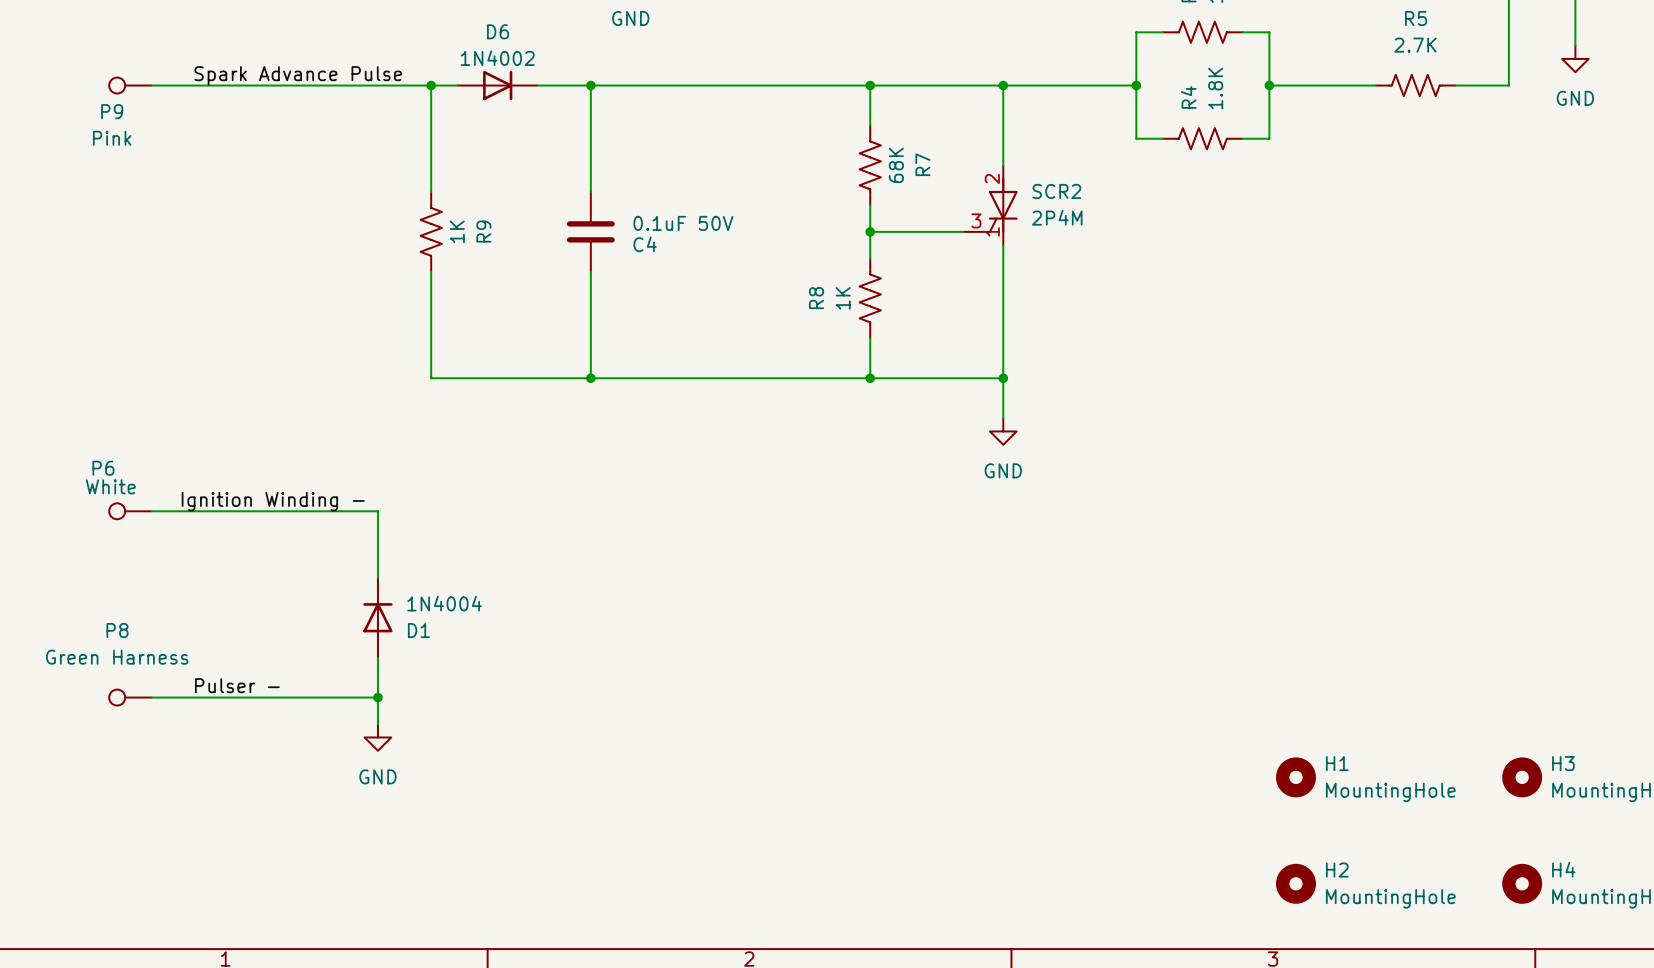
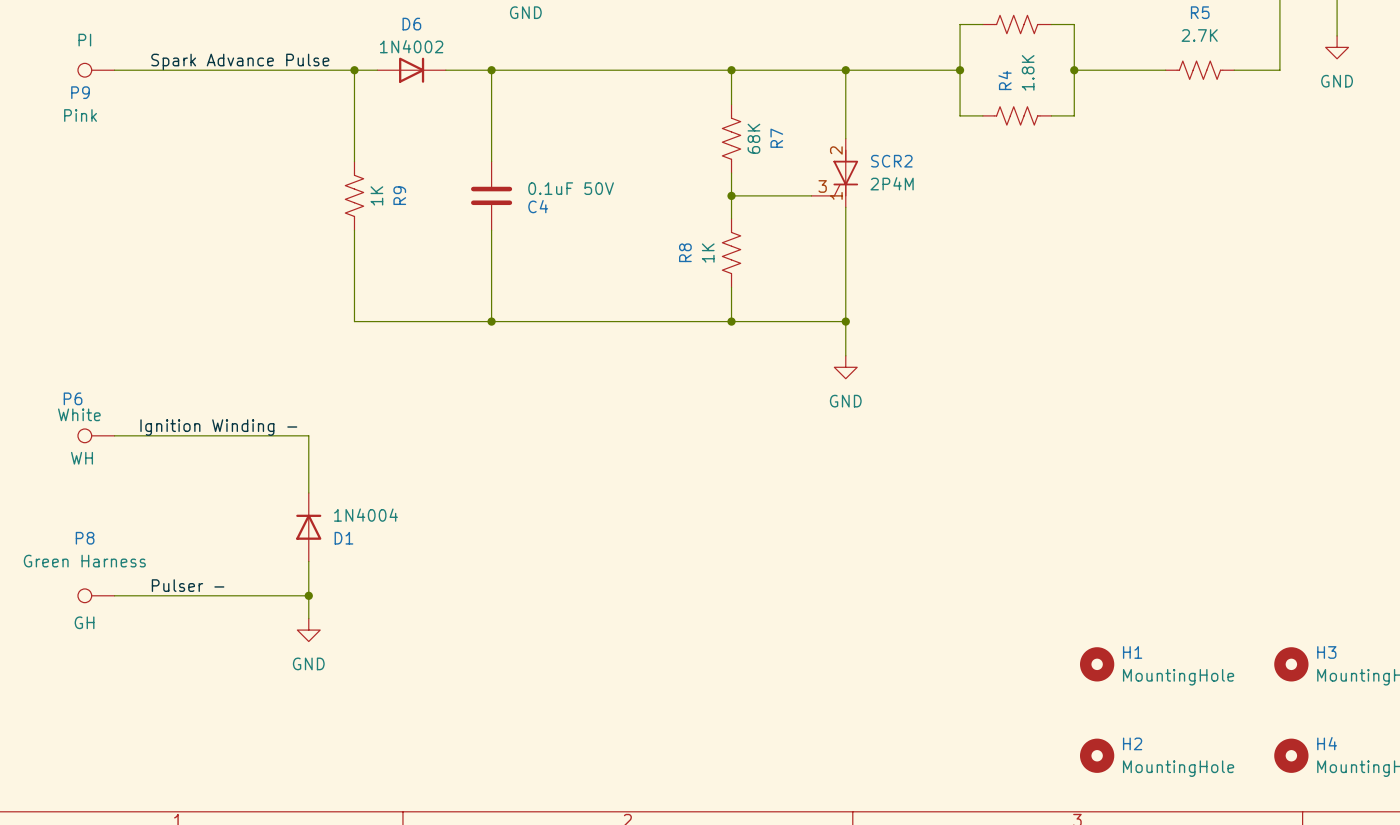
P9 text: none -> PI (84, 40)
P6 text: none -> WH (82, 458)
P8 text: none -> GH (84, 622)

